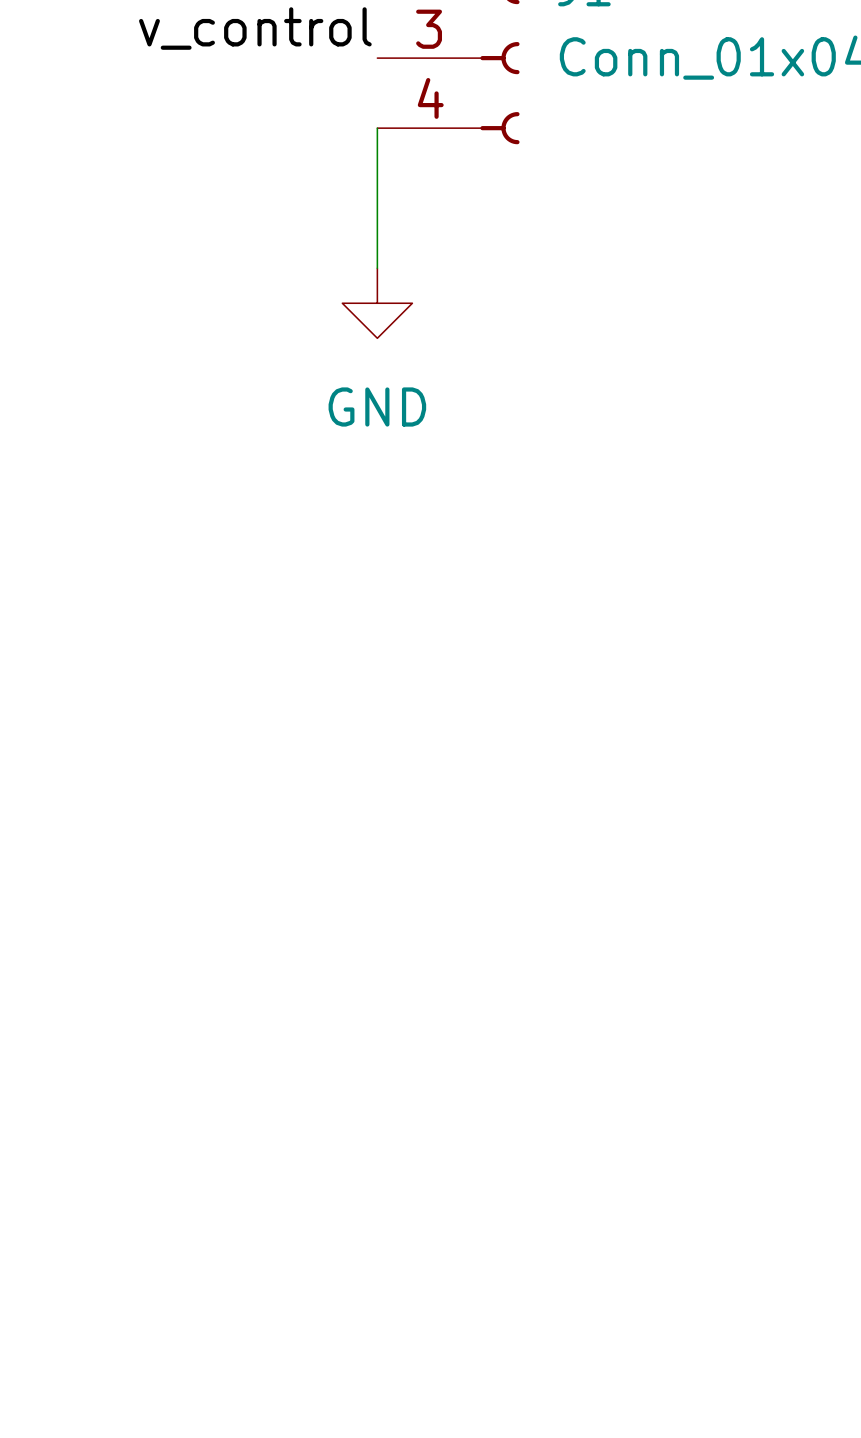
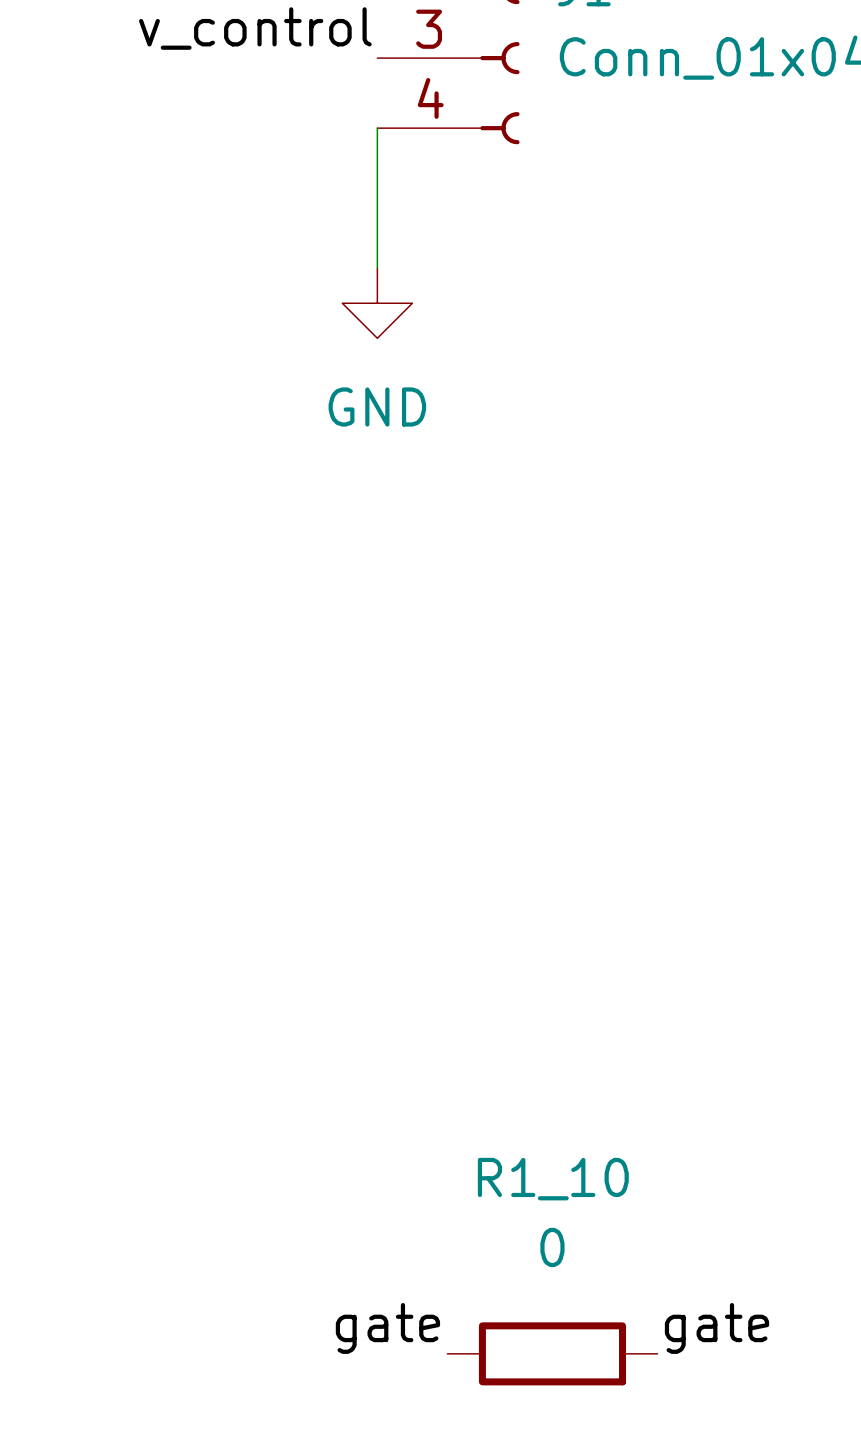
label: none -> gate (387, 1328)
label: none -> gate (716, 1328)
R1_10: none -> 0 (552, 1353)

